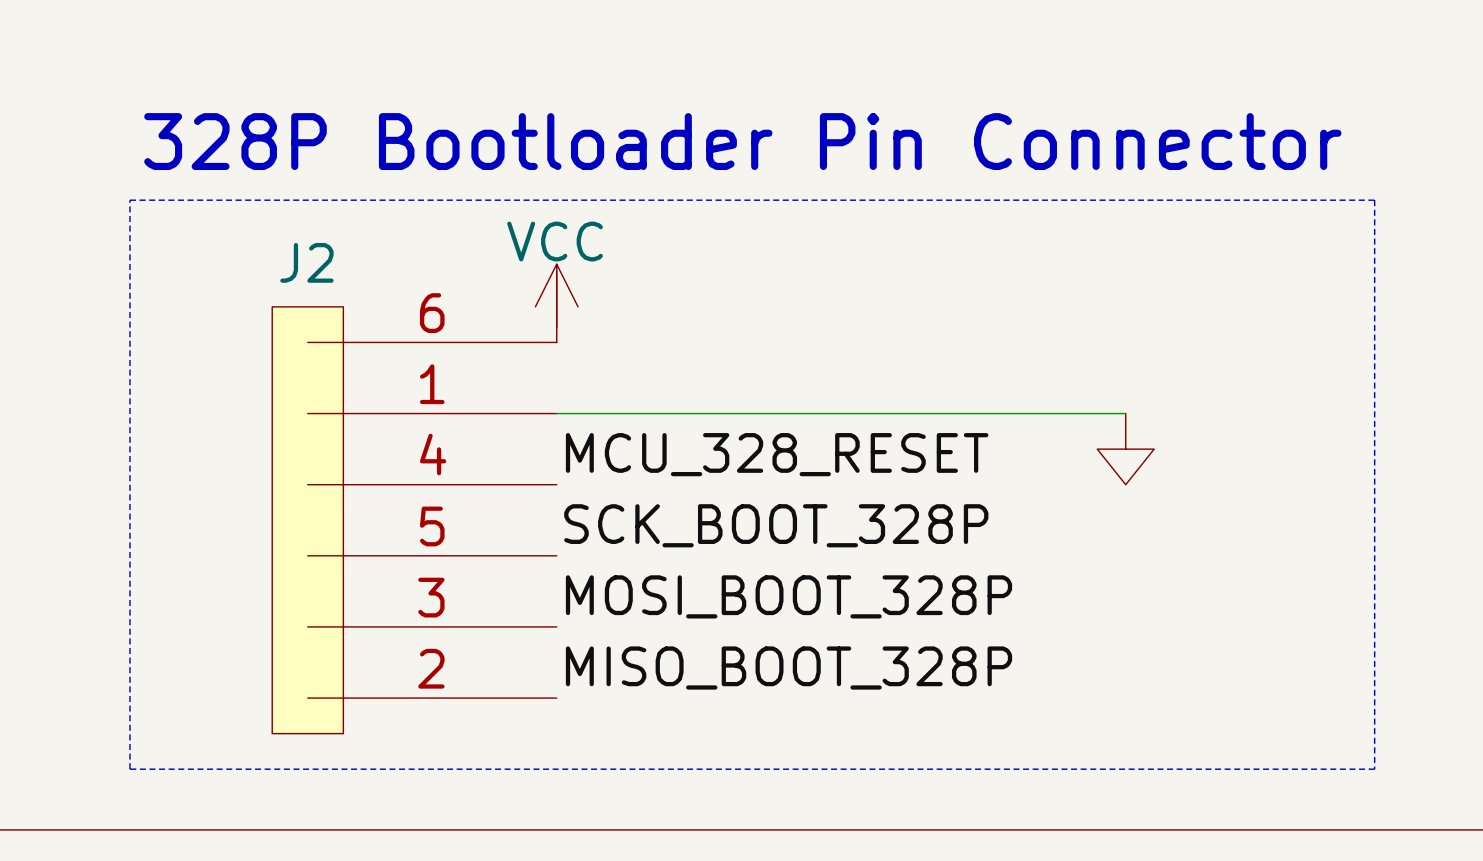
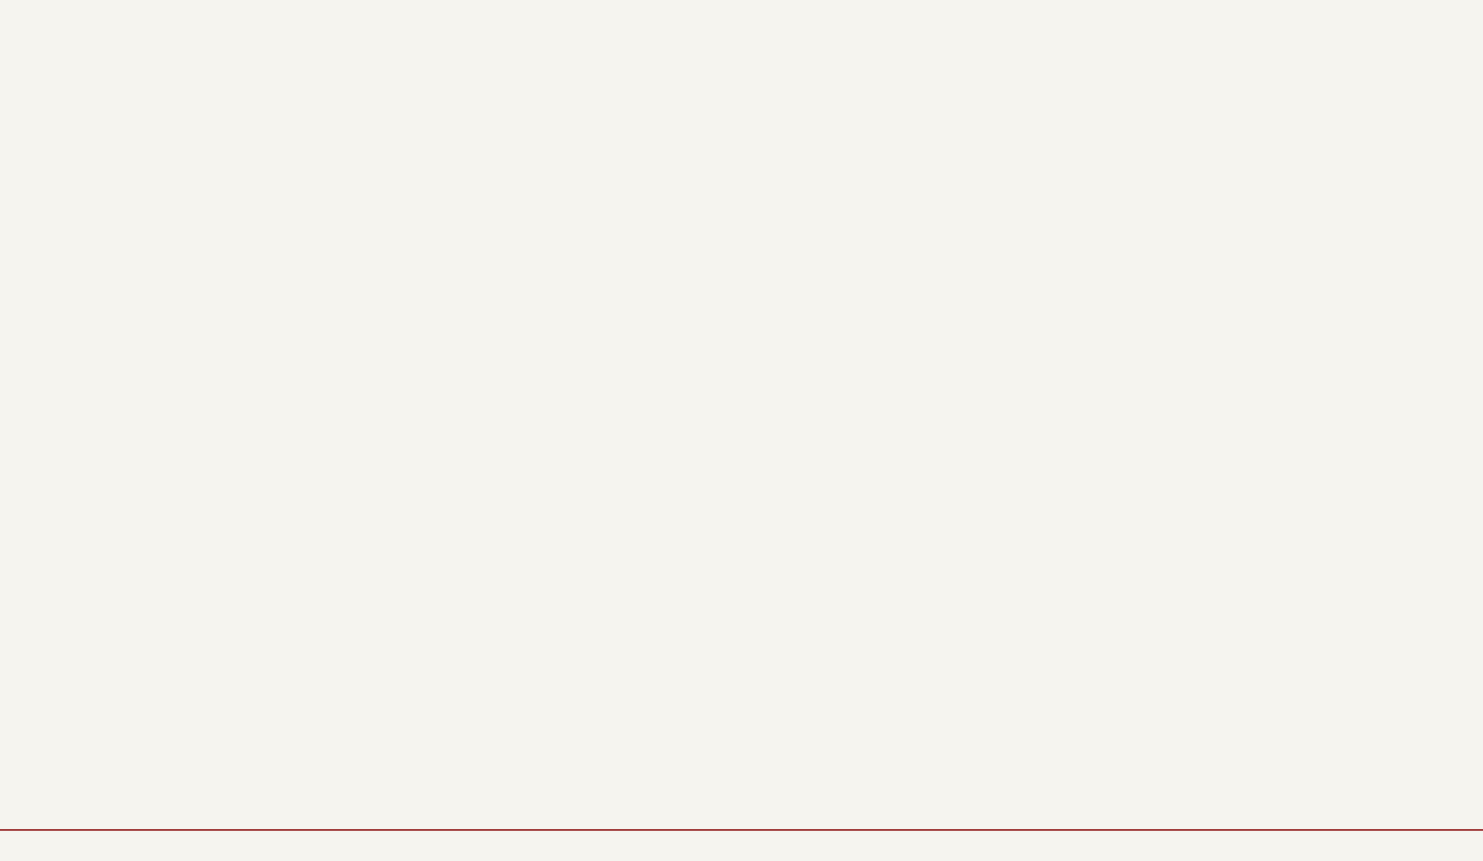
text: 328P Bootloader Pin Connector (742, 141) -> none
line: (129, 200) (1374, 200) (1374, 769) (129, 769) (129, 200) -> none
power symbol: VCC (556, 303) -> none
wire: (556, 413) (1125, 413) -> none
power symbol: (1125, 449) -> none
label: MCU_328_RESET (777, 454) -> none
J2: (414, 520) -> none
label: SCK_BOOT_328P (776, 525) -> none
label: MOSI_BOOT_328P (788, 596) -> none
label: MISO_BOOT_328P (788, 668) -> none

